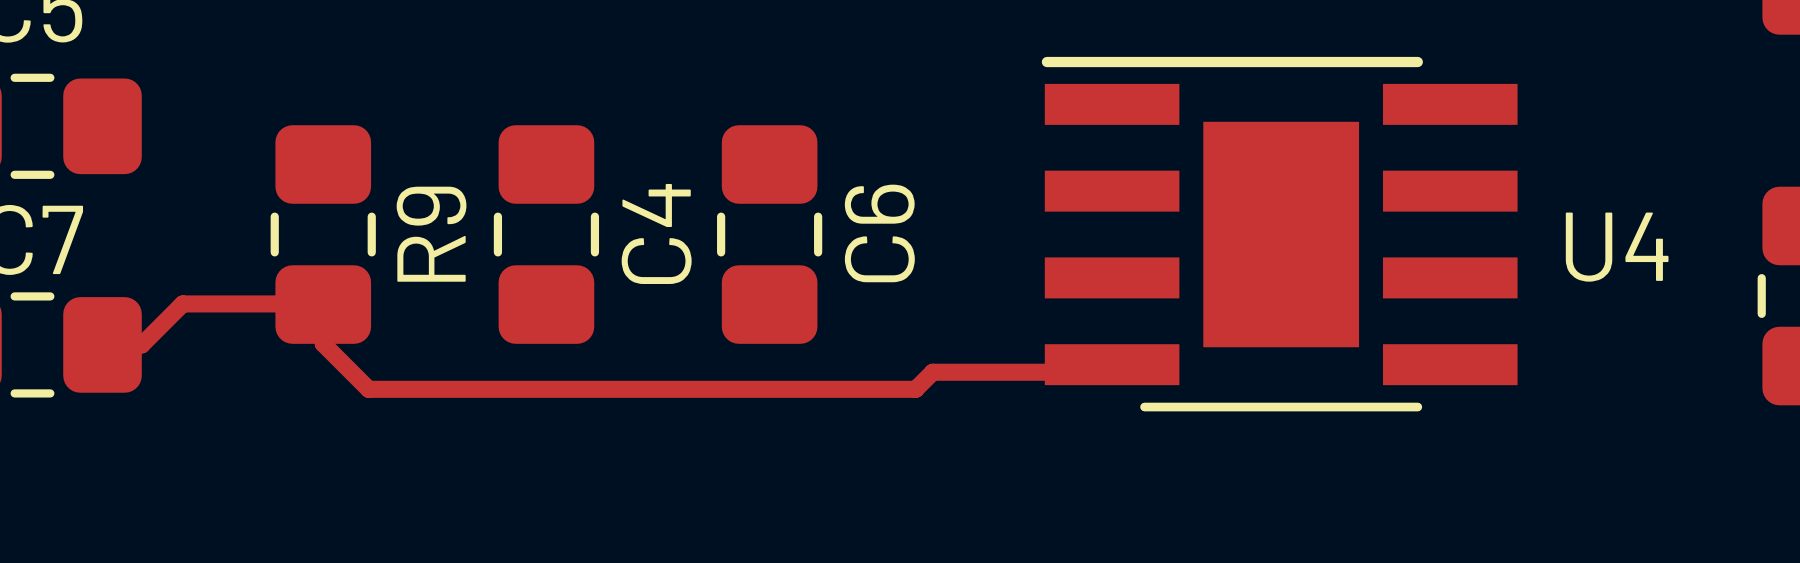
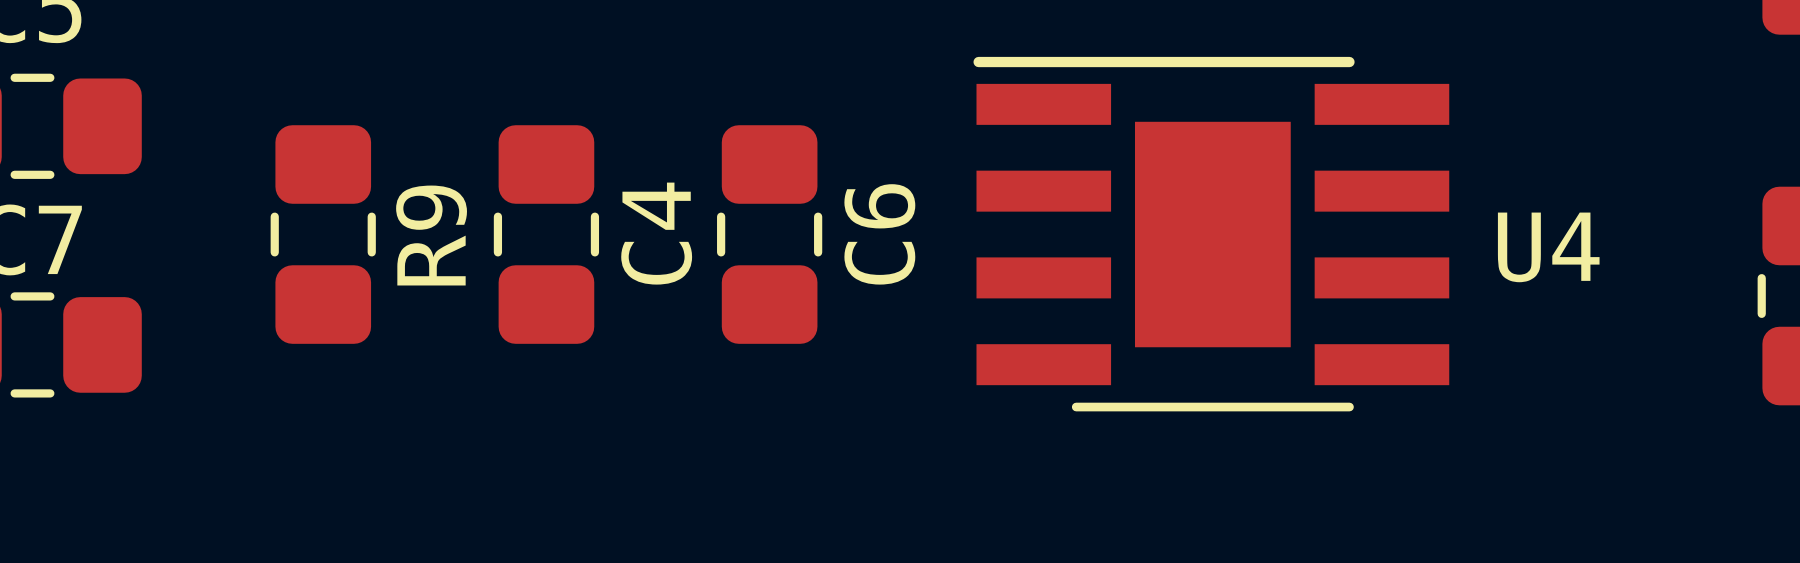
U4 position: (1279, 234) -> (1211, 234)
track: (317, 303) (182, 303) (141, 344) (102, 344) -> none
track: (323, 304) (323, 343) (368, 389) (915, 389) (932, 372) (1120, 372) -> none

